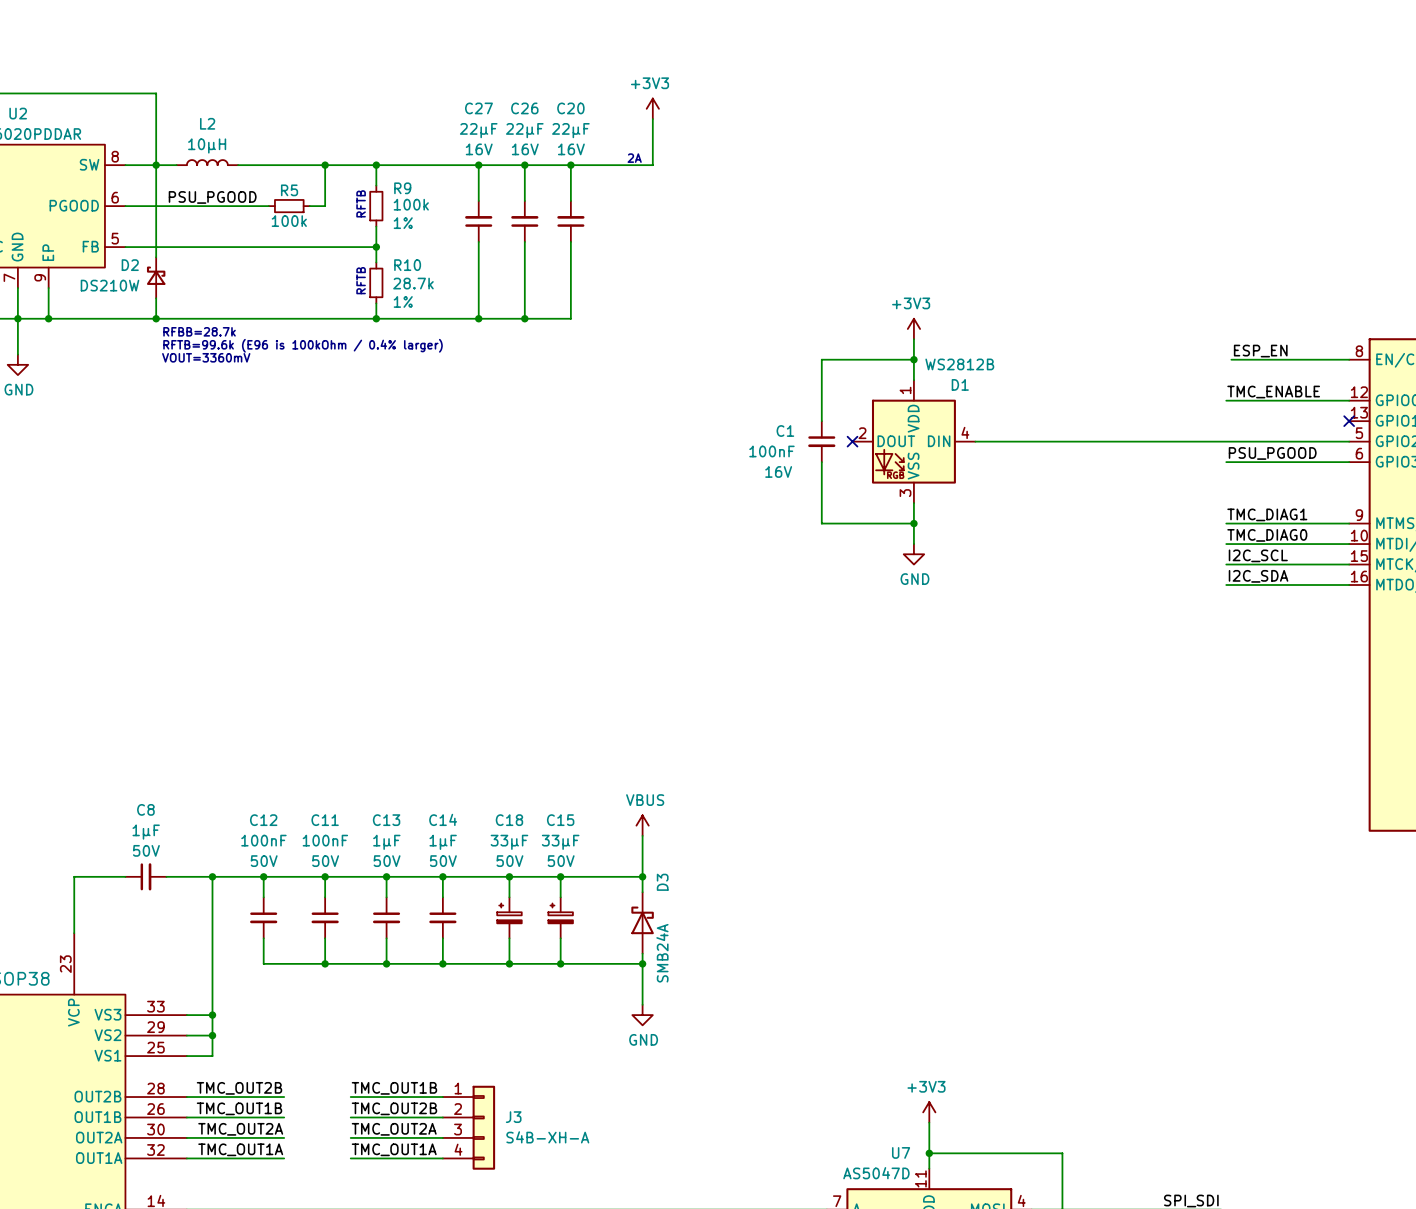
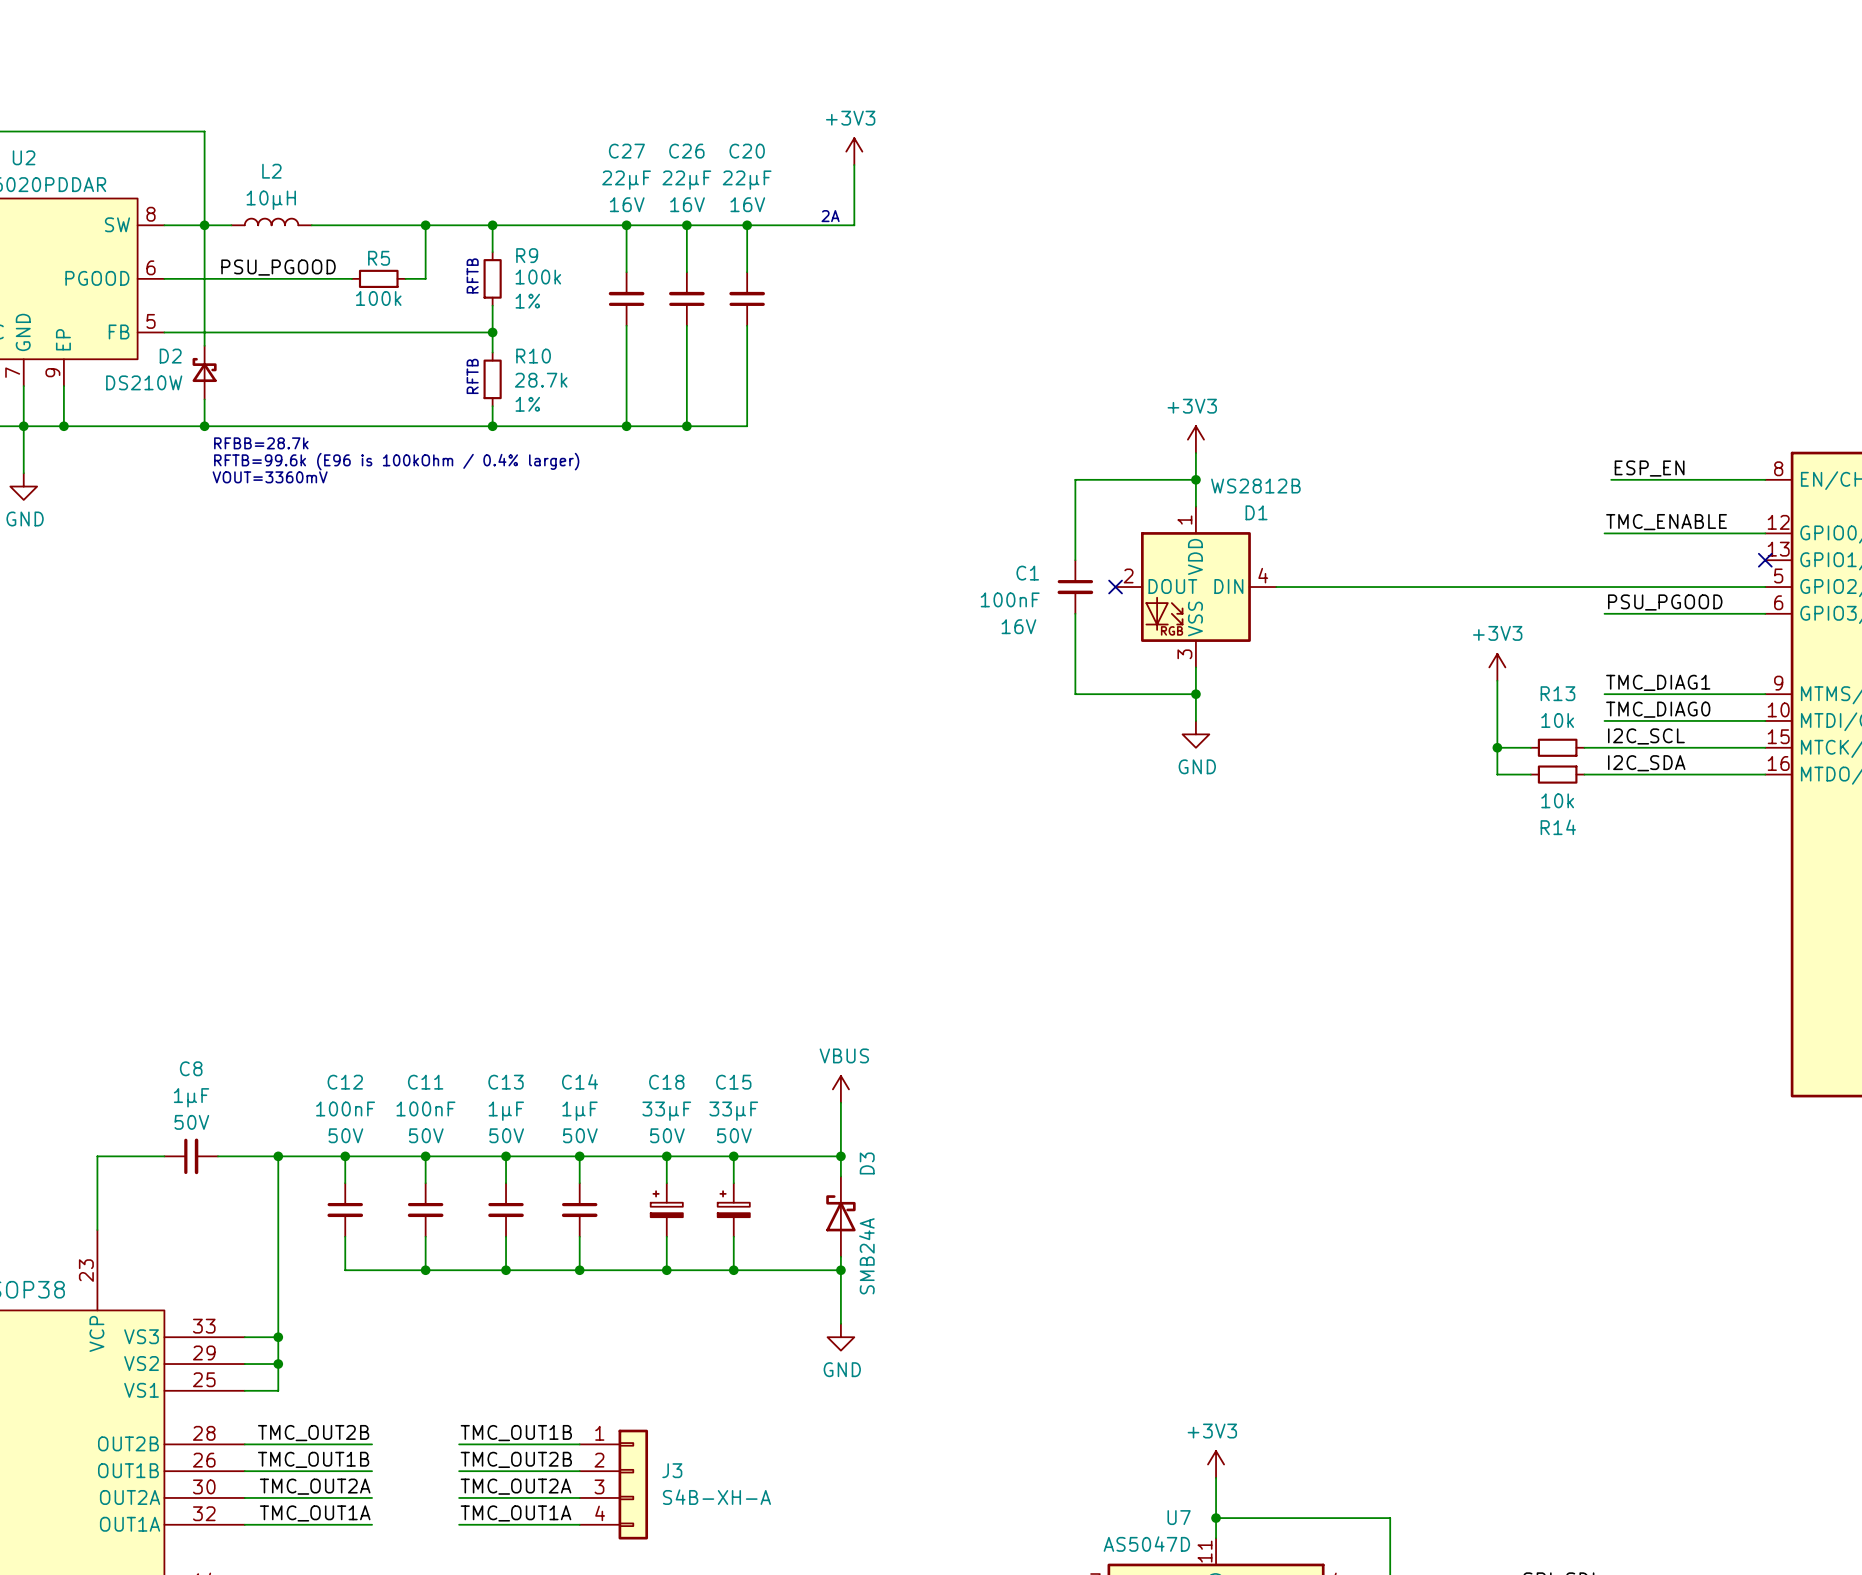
power symbol: none -> +3V3 (1497, 667)
wire: none -> (1497, 680) (1497, 774) (1530, 774)
wire: none -> (1497, 747) (1530, 747)
junction: none -> (1497, 747)
R13: none -> 10k (1557, 747)
wire: none -> (1584, 747) (1604, 747)
R14: none -> 10k (1557, 774)
wire: none -> (1584, 774) (1604, 774)

